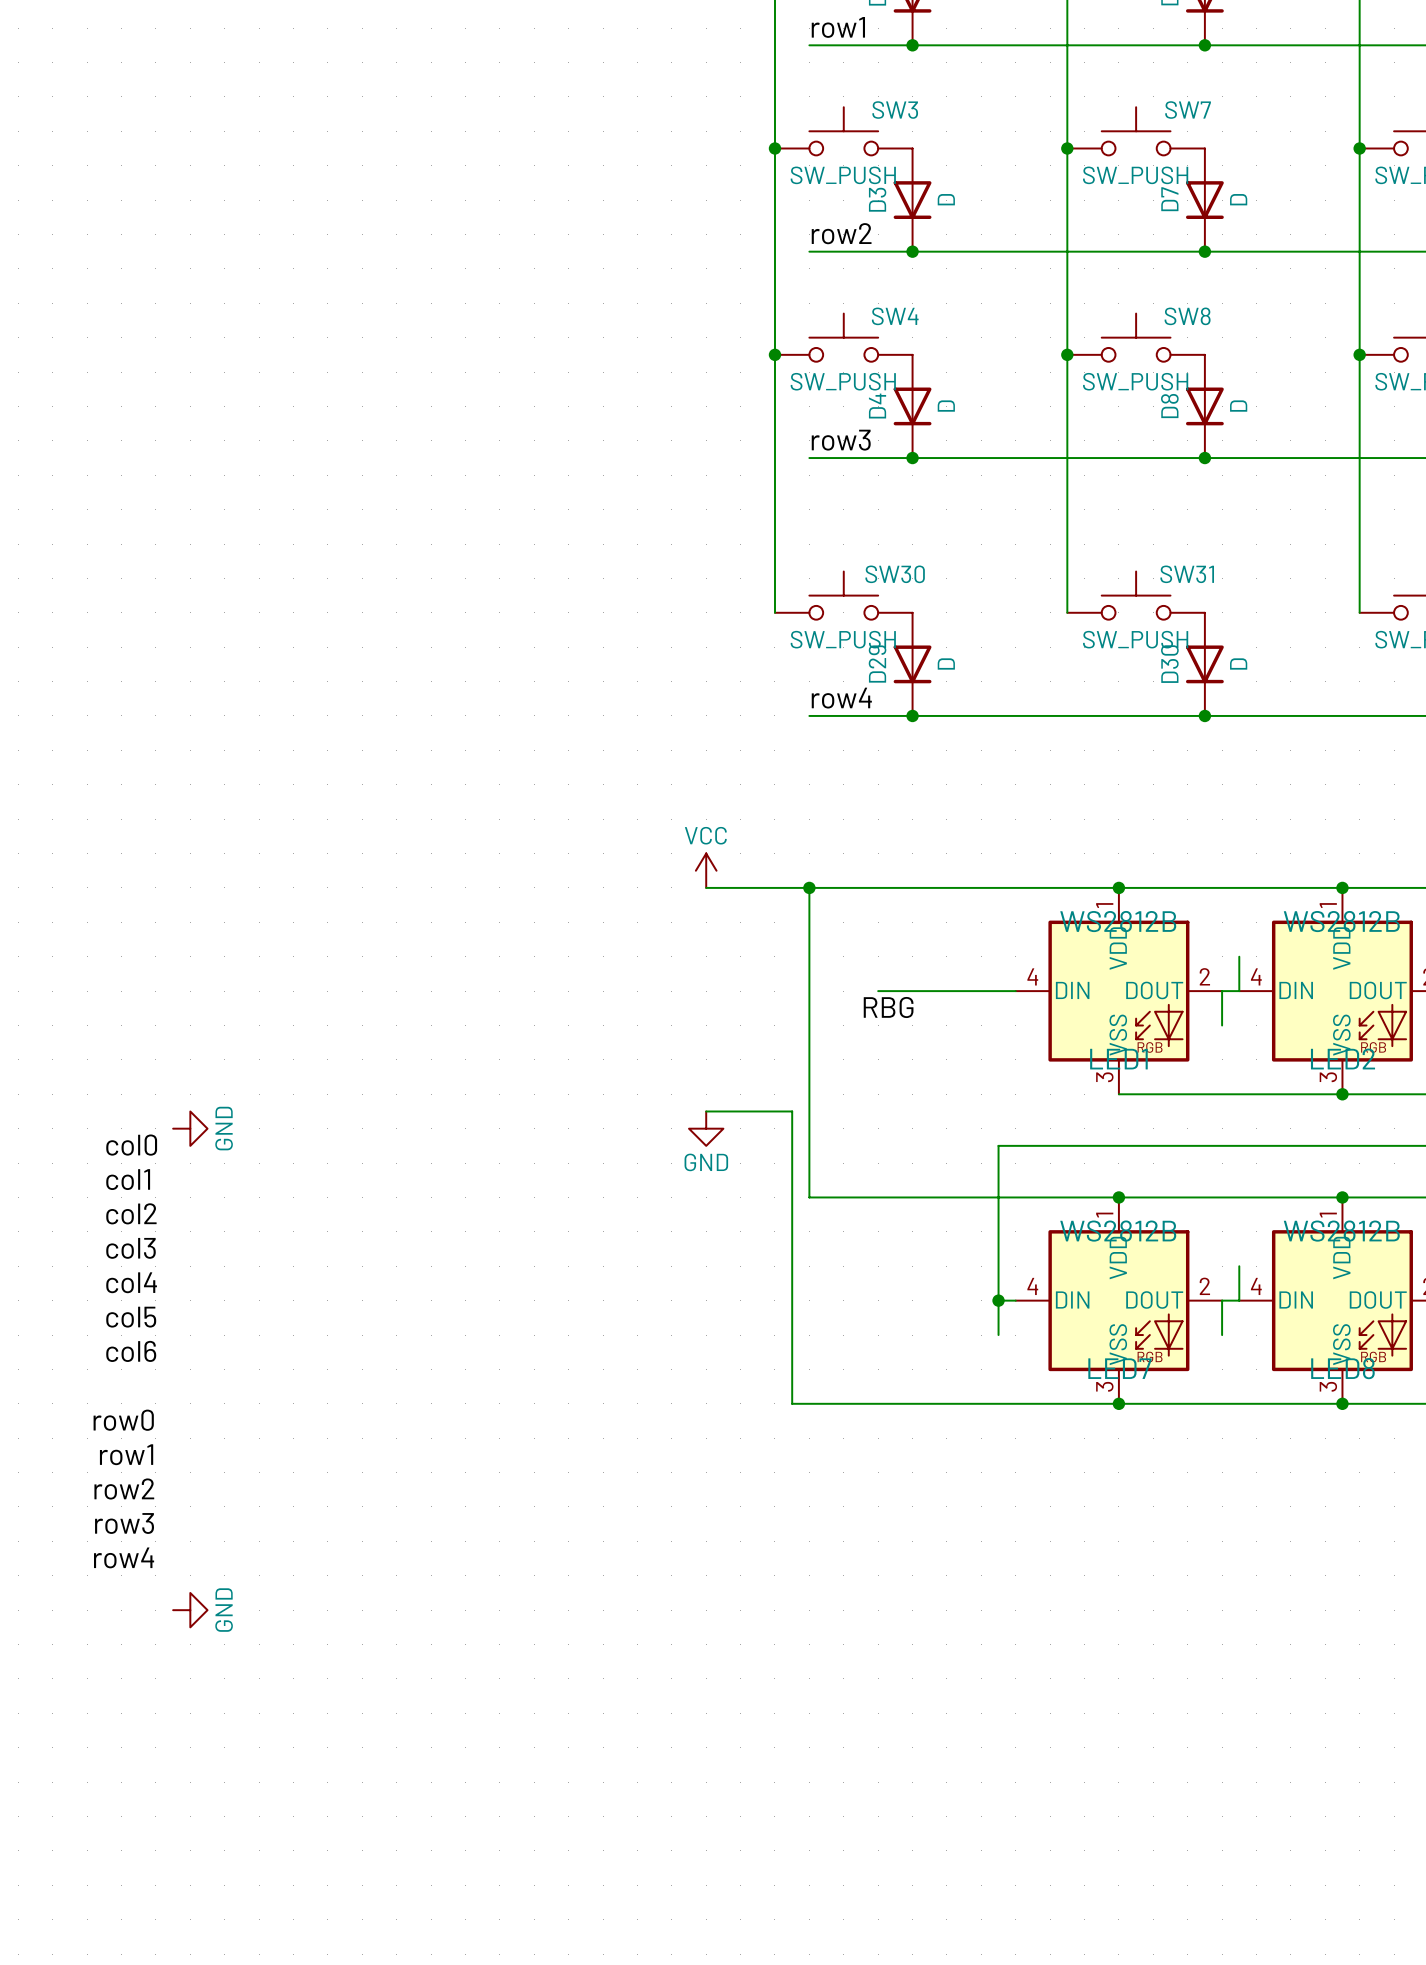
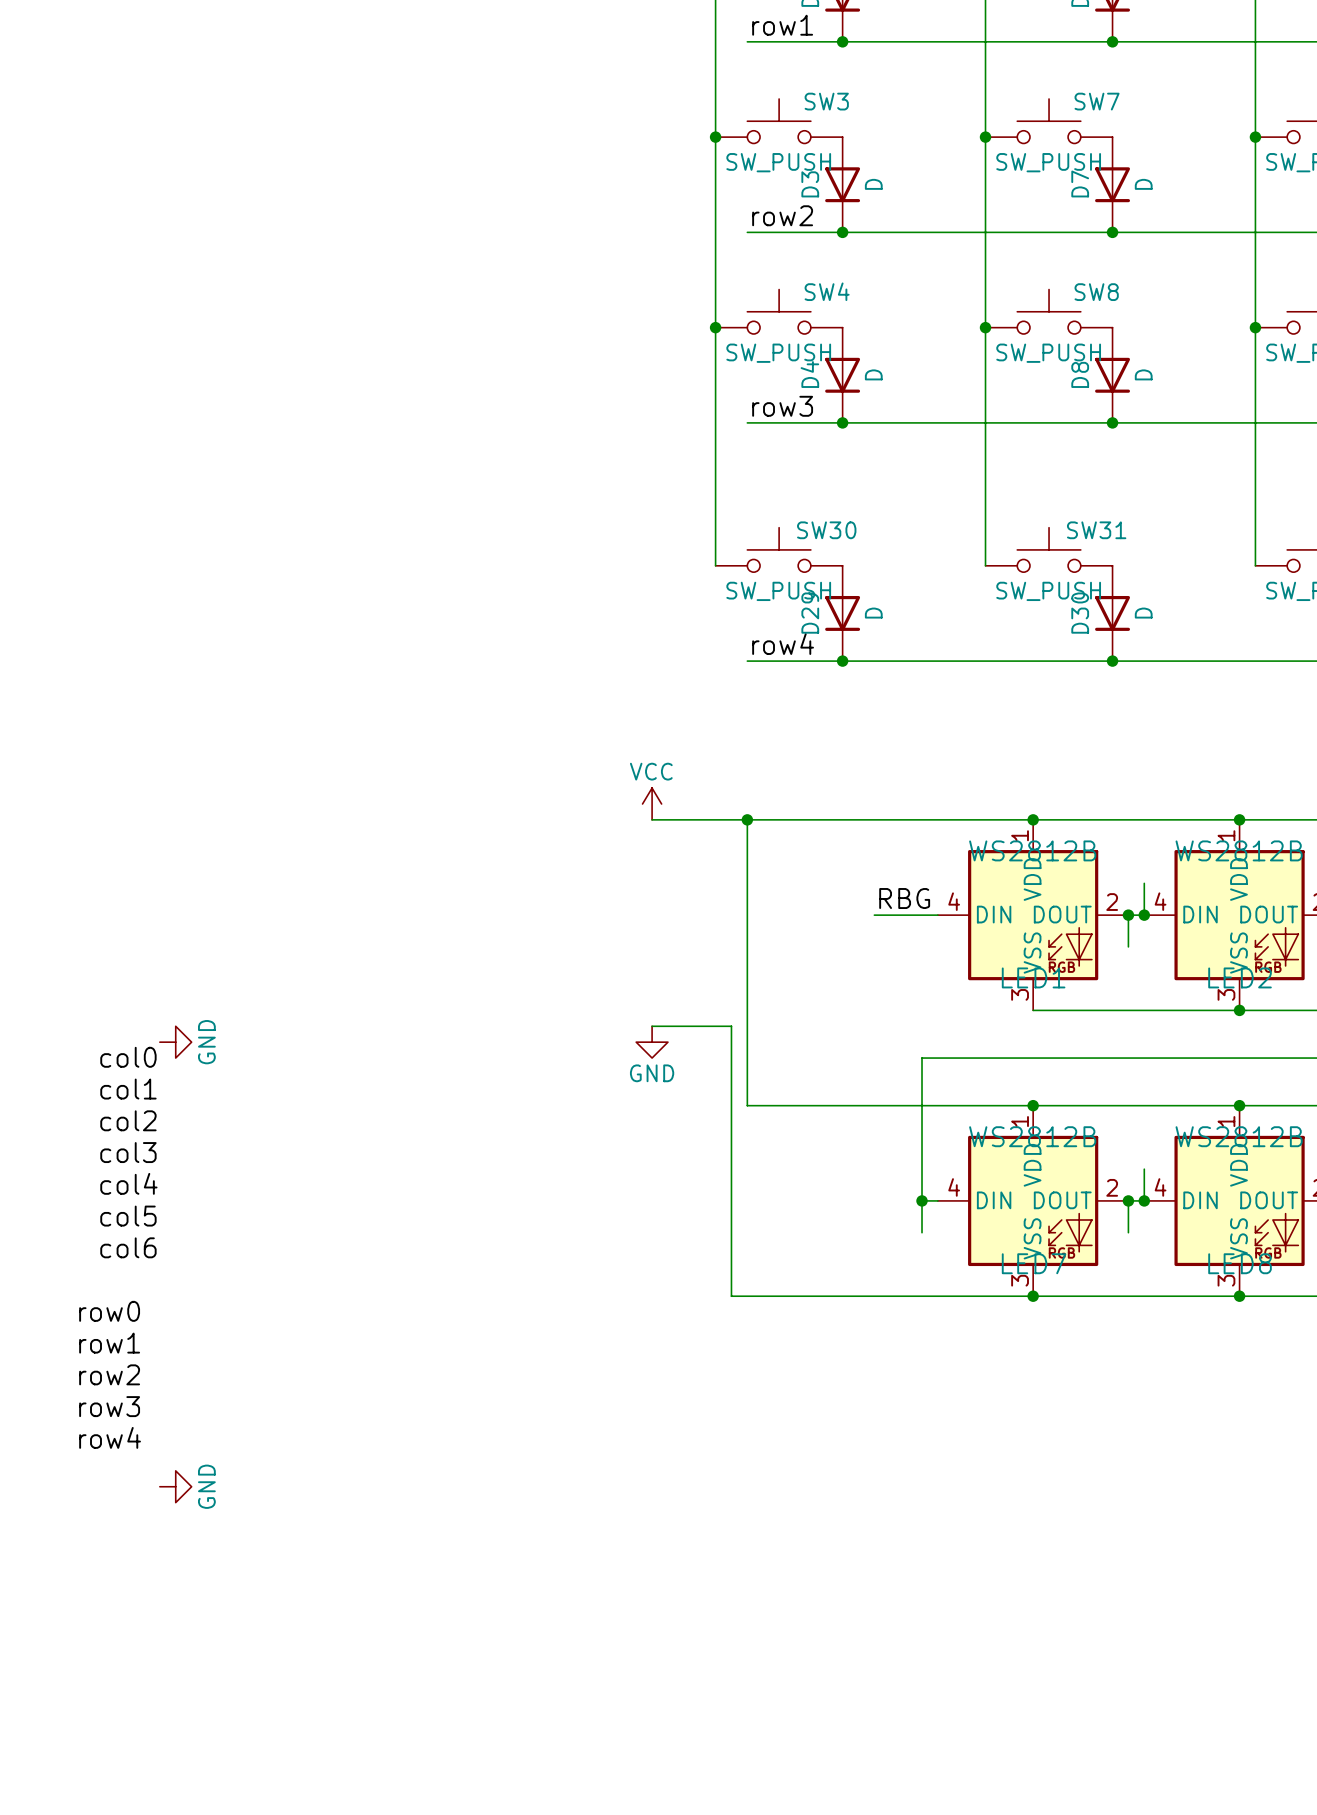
wire: (878, 991) (946, 991) -> none
junction: none -> (1128, 915)
junction: none -> (1144, 915)
label position: RBG (888, 1007) -> RBG (904, 898)
junction: none -> (1128, 1200)
junction: none -> (1144, 1200)

